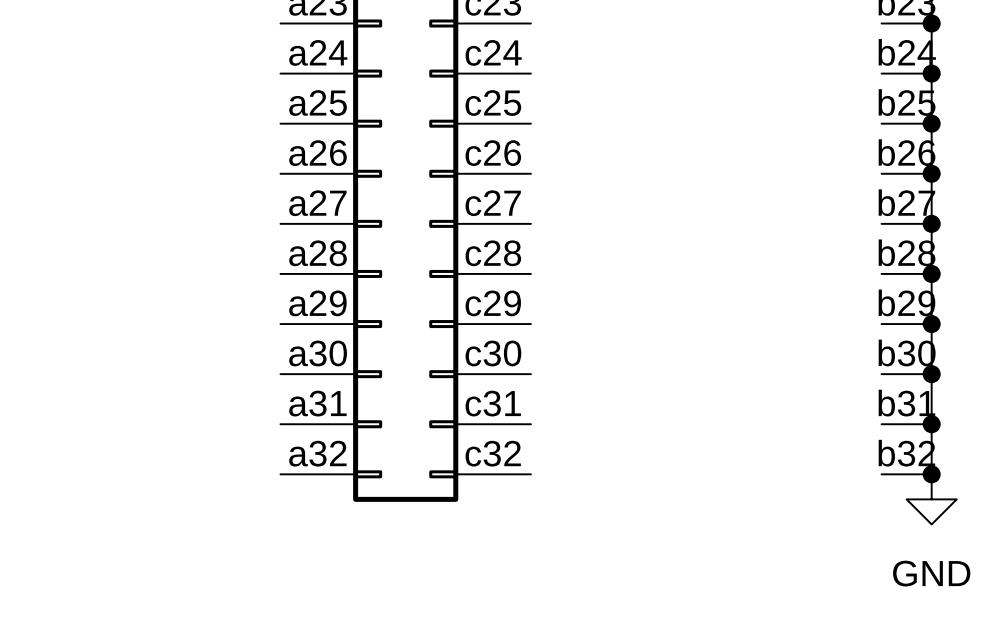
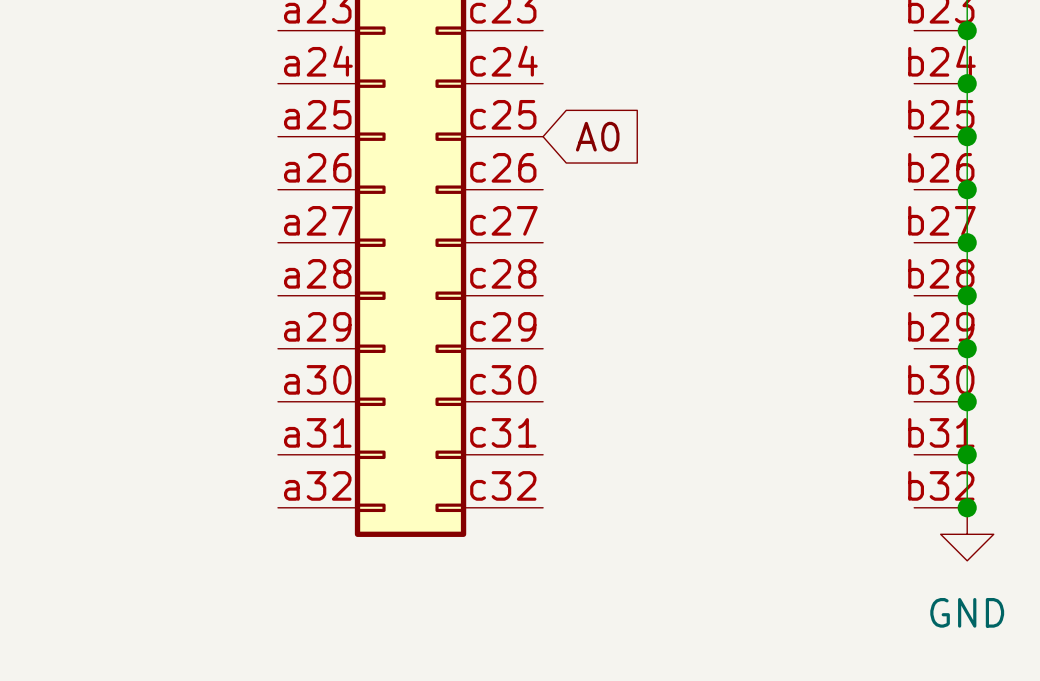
global label: none -> A0 (597, 136)

